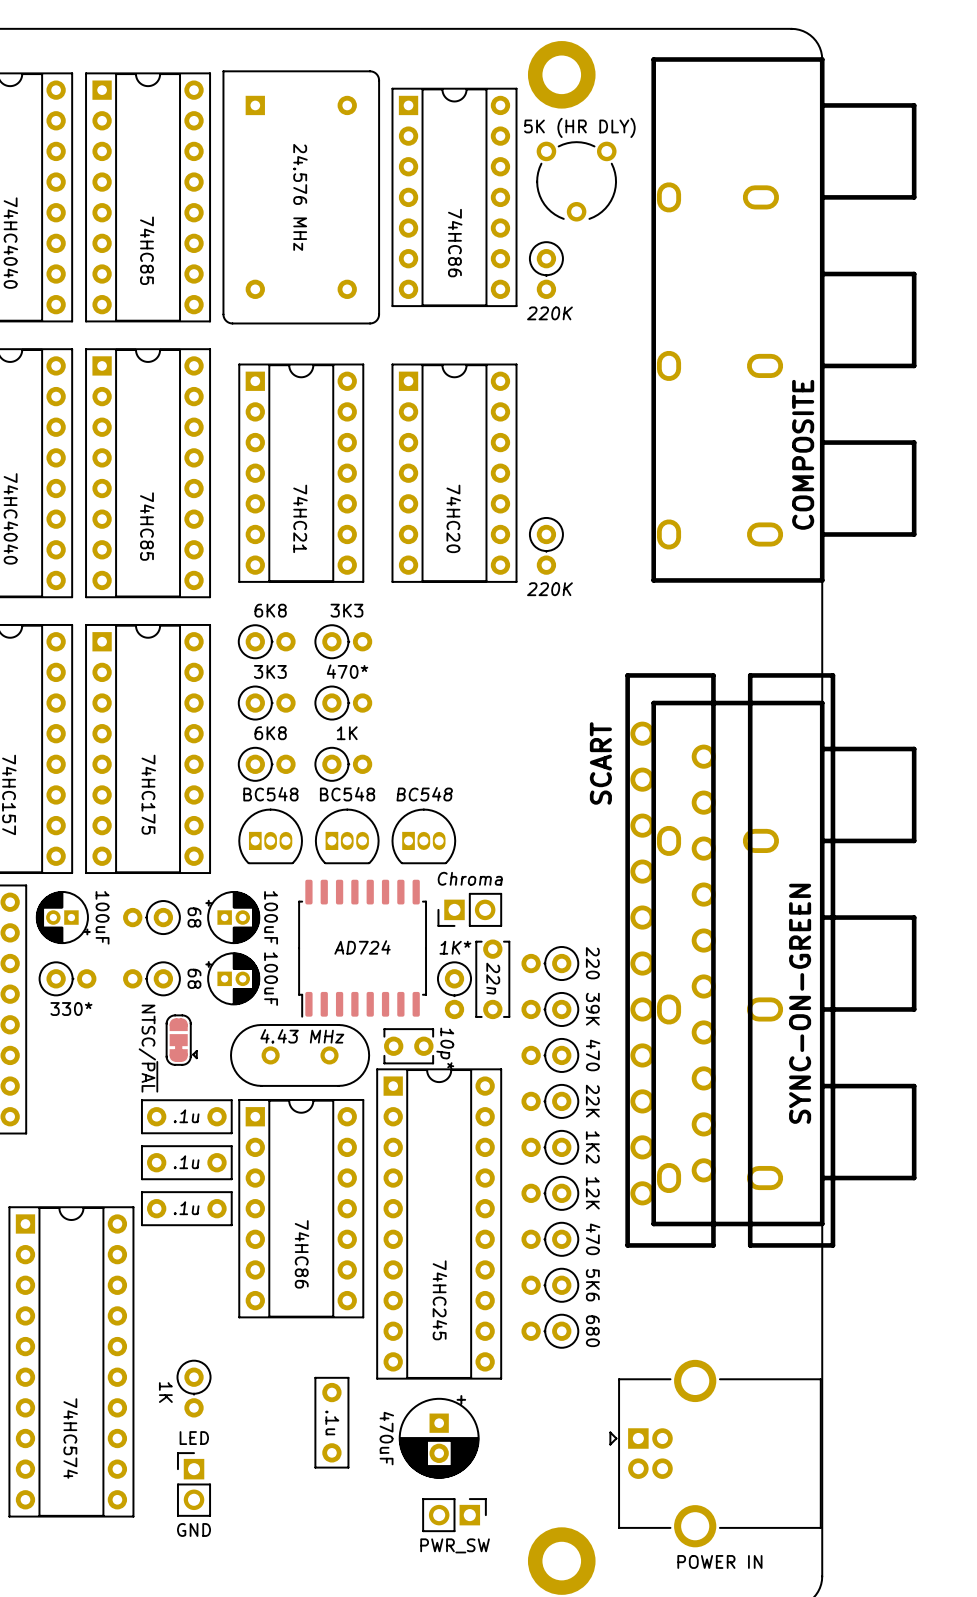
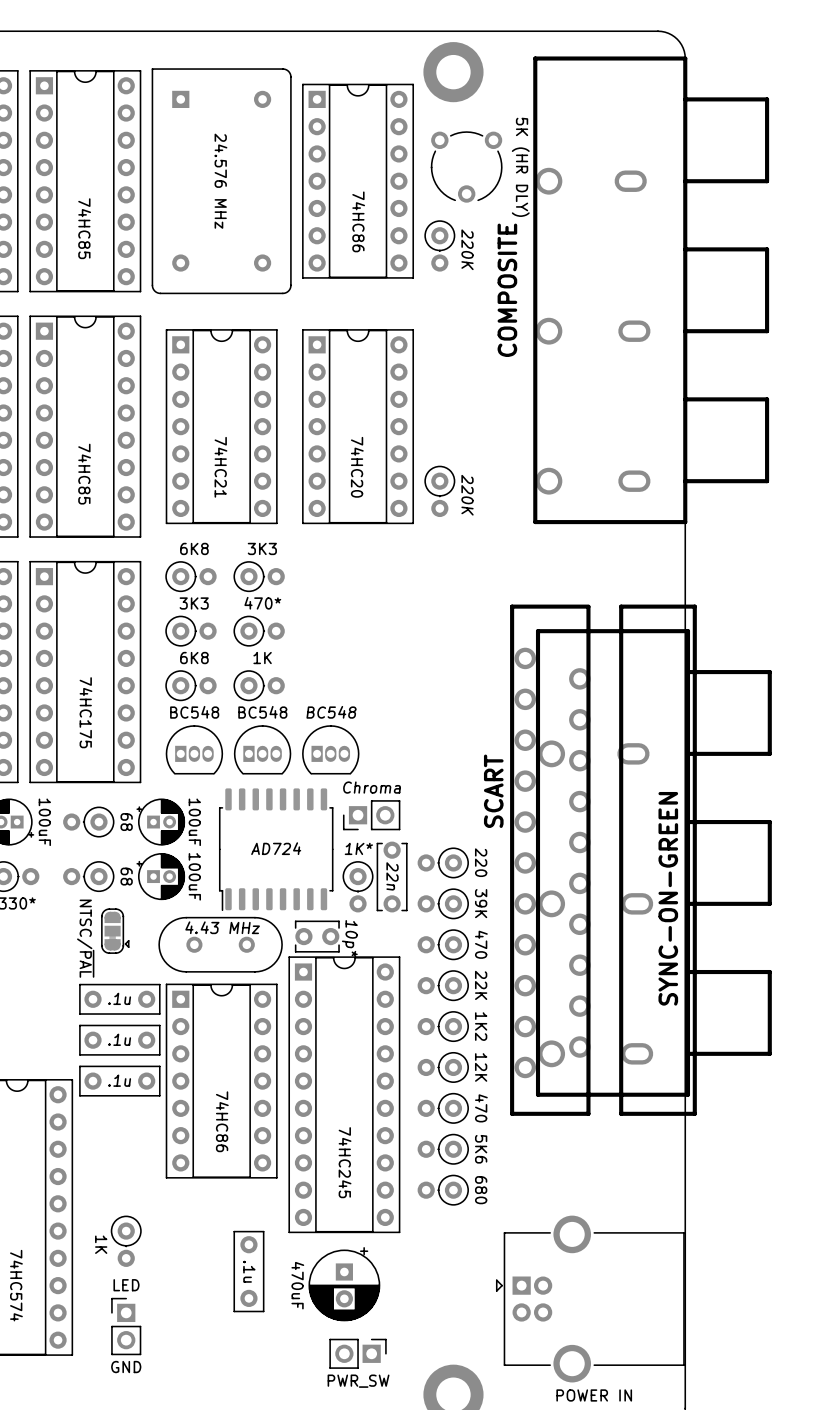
part footprint: [651, 57, 917, 583] -> [533, 56, 770, 525]
part value rotation: 0° (579, 127) -> 90° clockwise (520, 167)
part value rotation: 0° (549, 313) -> 90° clockwise (467, 249)
part value position: COMPOSITE (803, 454) -> COMPOSITE (507, 290)
part value rotation: 0° (549, 589) -> 90° clockwise (467, 495)
part footprint: [651, 700, 917, 1227] -> [535, 629, 772, 1097]
part value position: SCART (600, 763) -> SCART (493, 791)

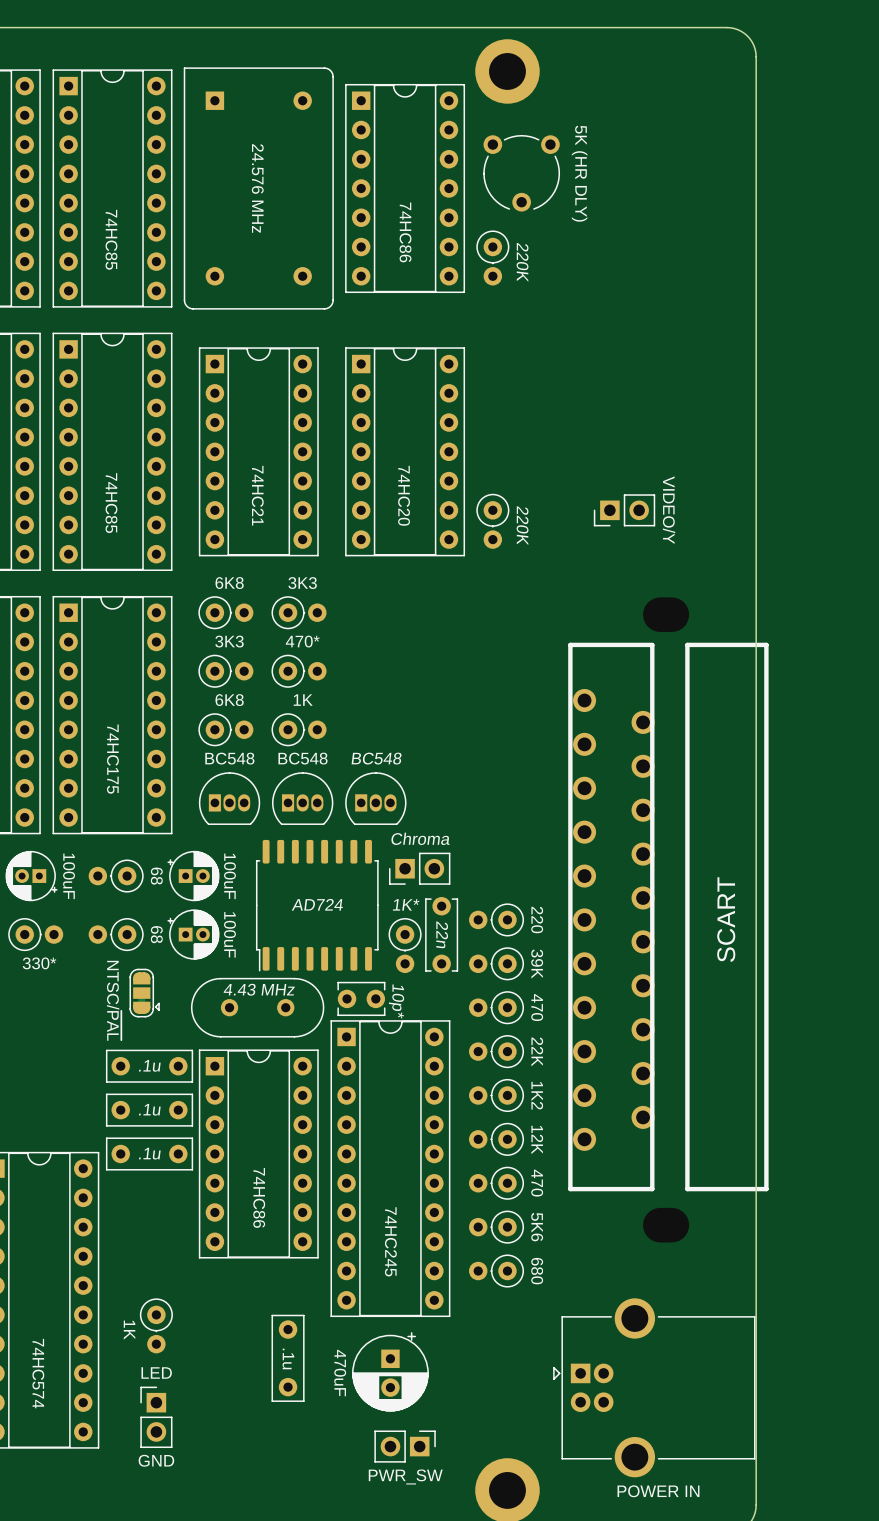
part: COMPOSITE (651, 290) -> none
part: none -> VIDEO/Y (624, 510)
part value position: SCART (493, 791) -> SCART (726, 919)
part: SYNC-ON-GREEN (653, 862) -> none

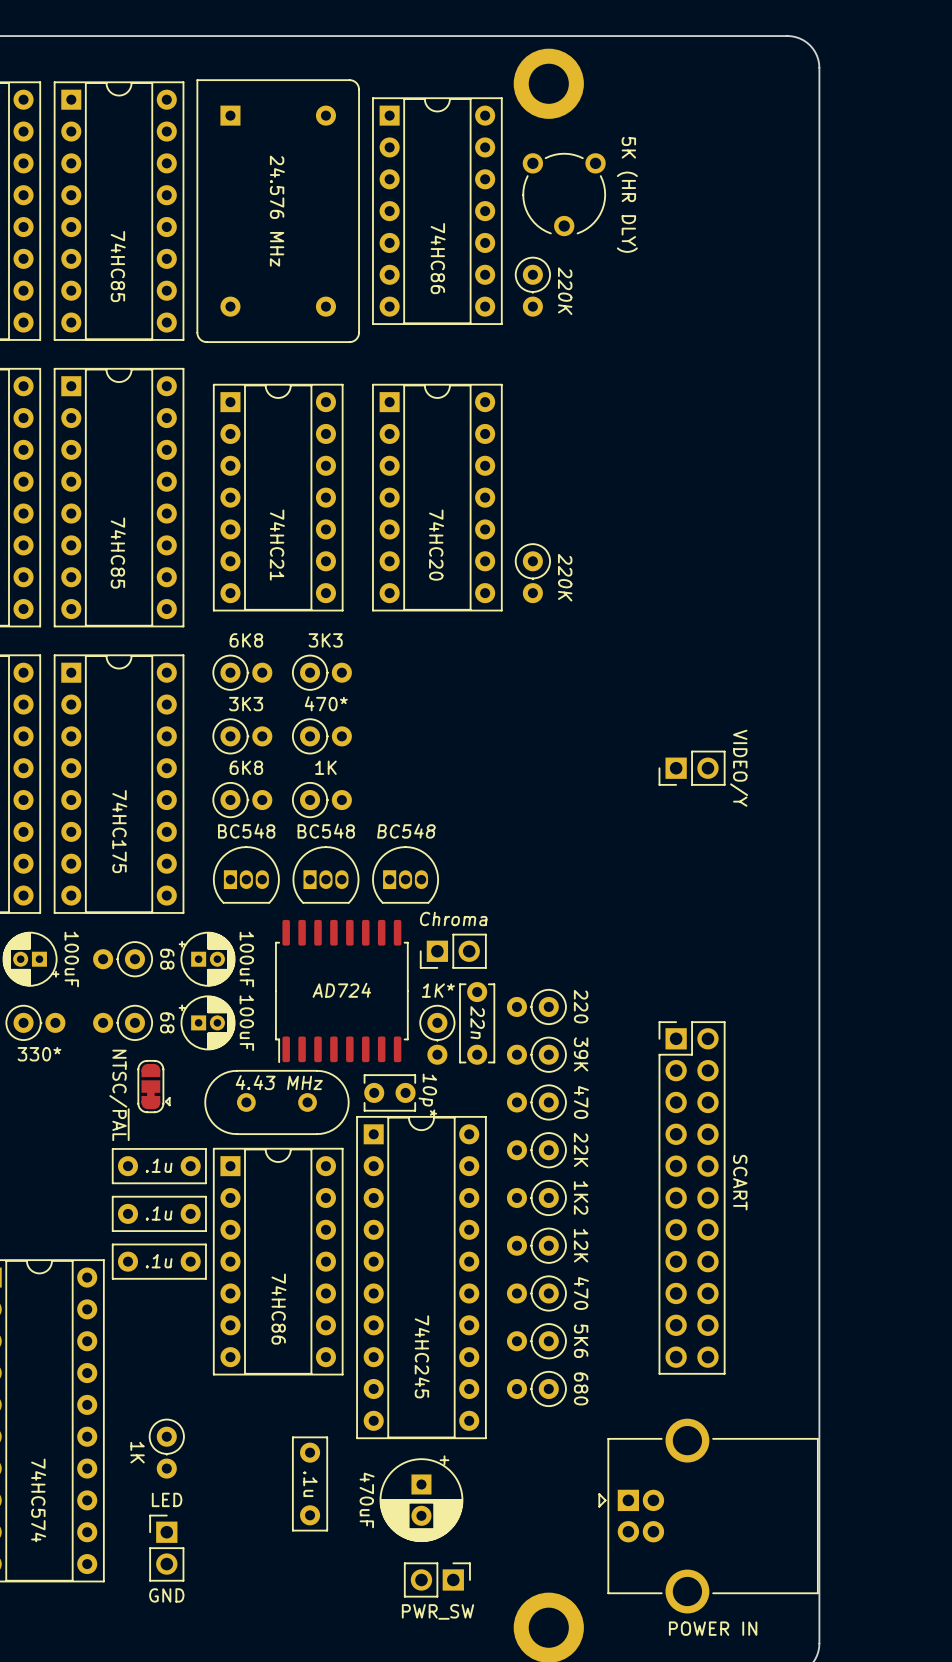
part position: (624, 510) -> (692, 768)
part: SCART (668, 919) -> none
part: none -> SCART (692, 1197)

